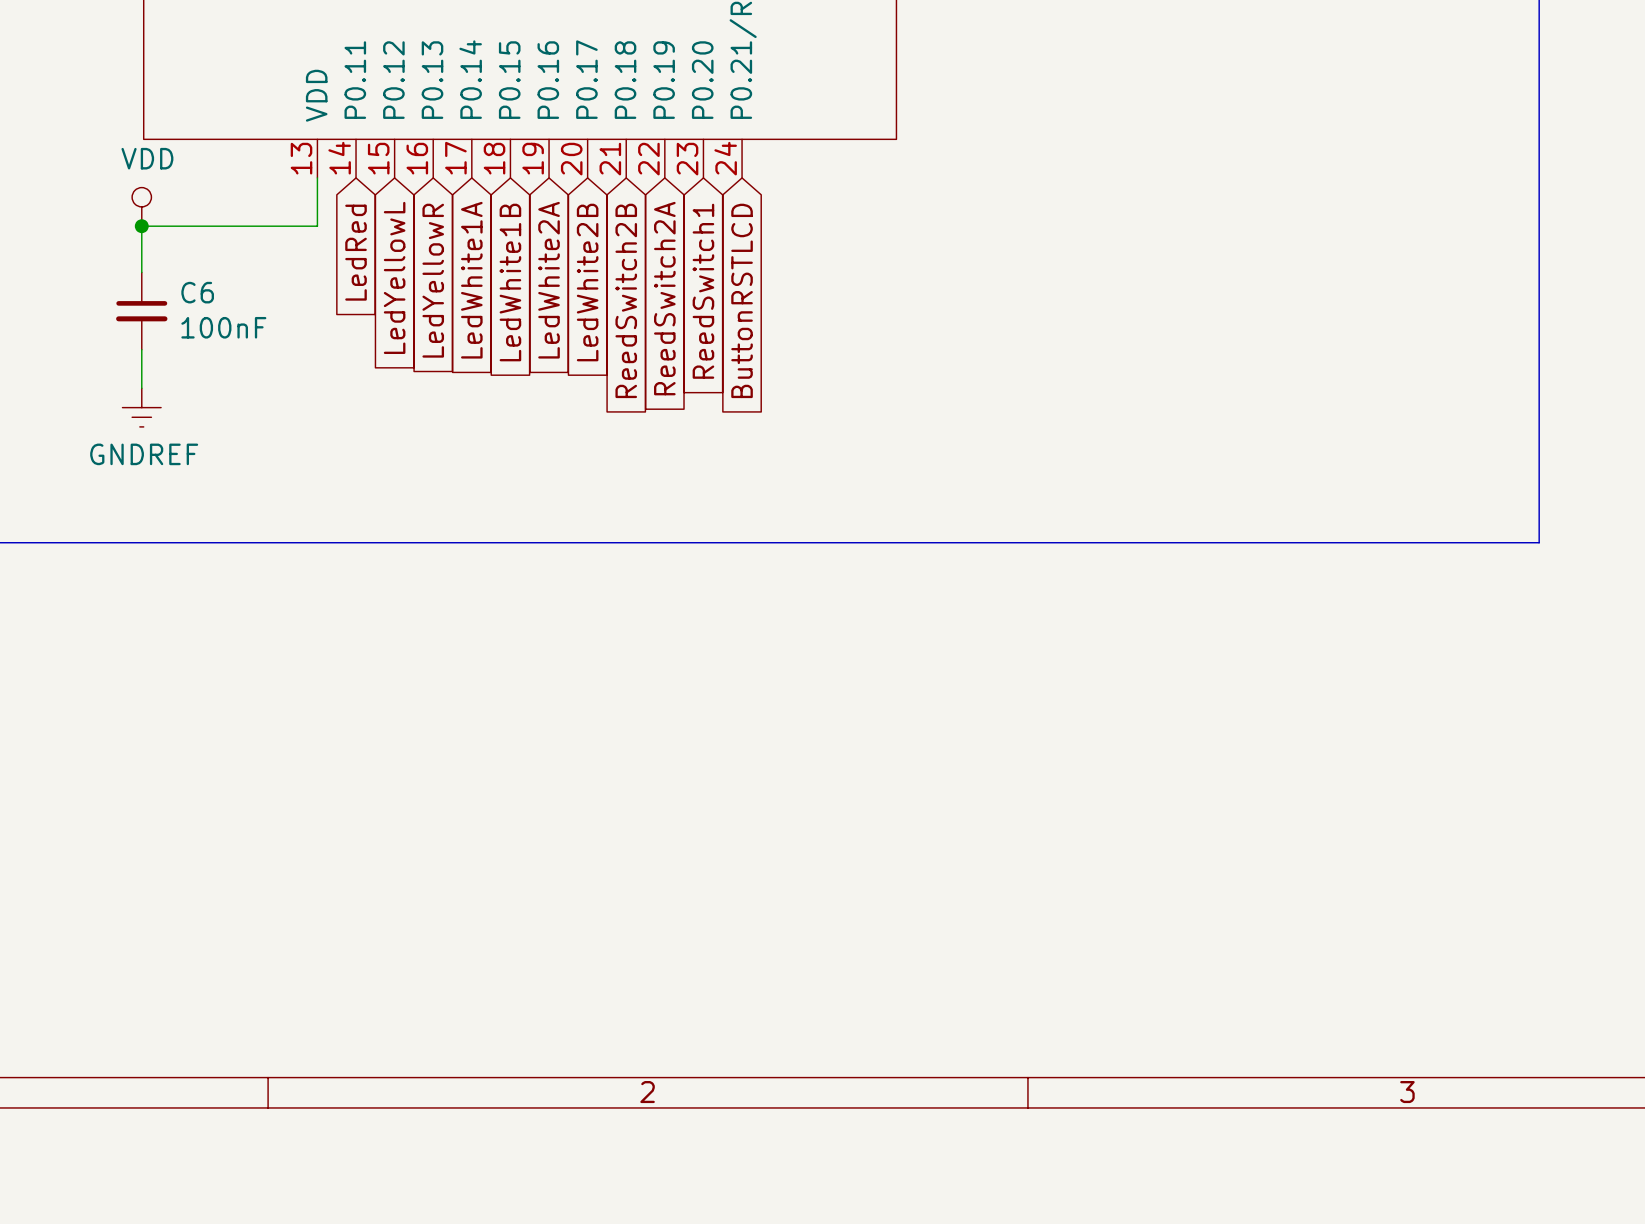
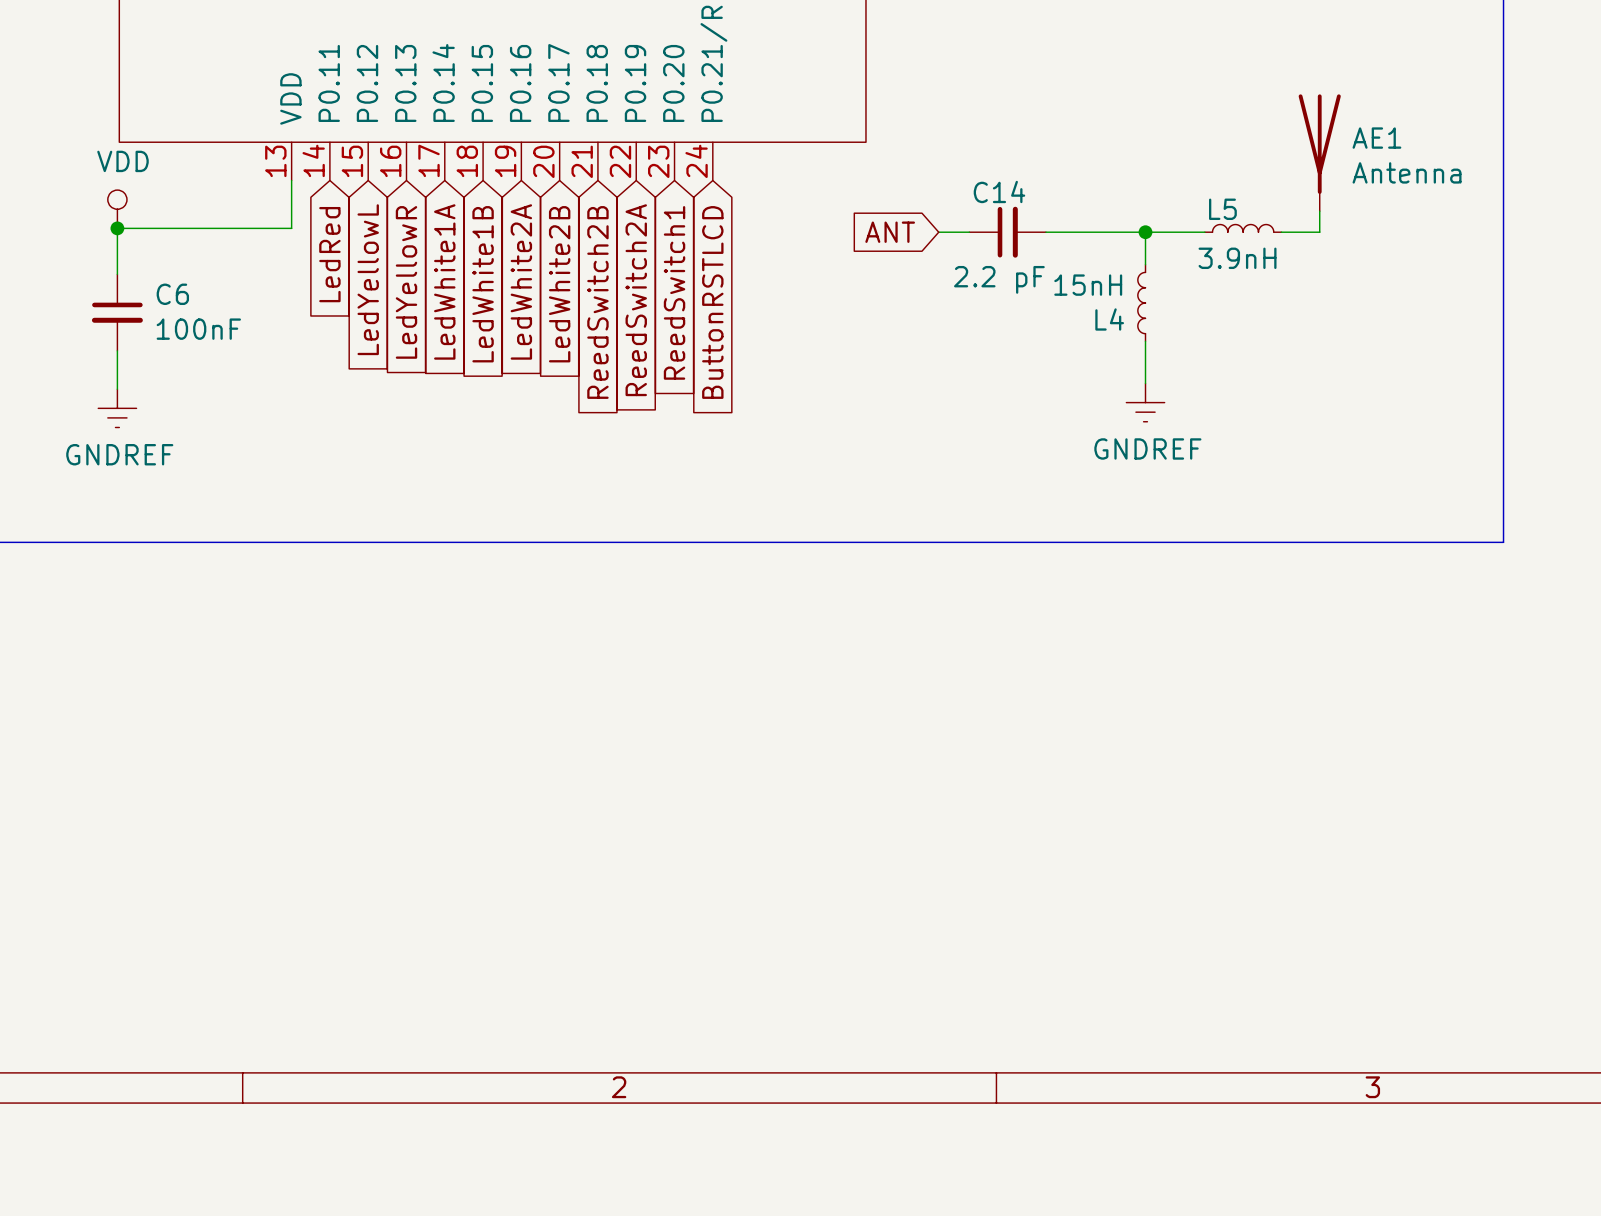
AE1: none -> Antenna (1319, 152)
wire: none -> (1319, 211) (1319, 232) (1281, 232)
L5: none -> 3.9nH (1243, 228)
global label: none -> ANT (890, 232)
wire: none -> (938, 232) (969, 232)
C14: none -> 2.2 pF (1007, 232)
wire: none -> (1045, 232) (1204, 232)
wire: none -> (1145, 232) (1145, 264)
junction: none -> (1145, 232)
L4: none -> 15nH (1141, 303)
wire: none -> (1145, 341) (1145, 383)
power symbol: none -> GNDREF (1145, 402)

